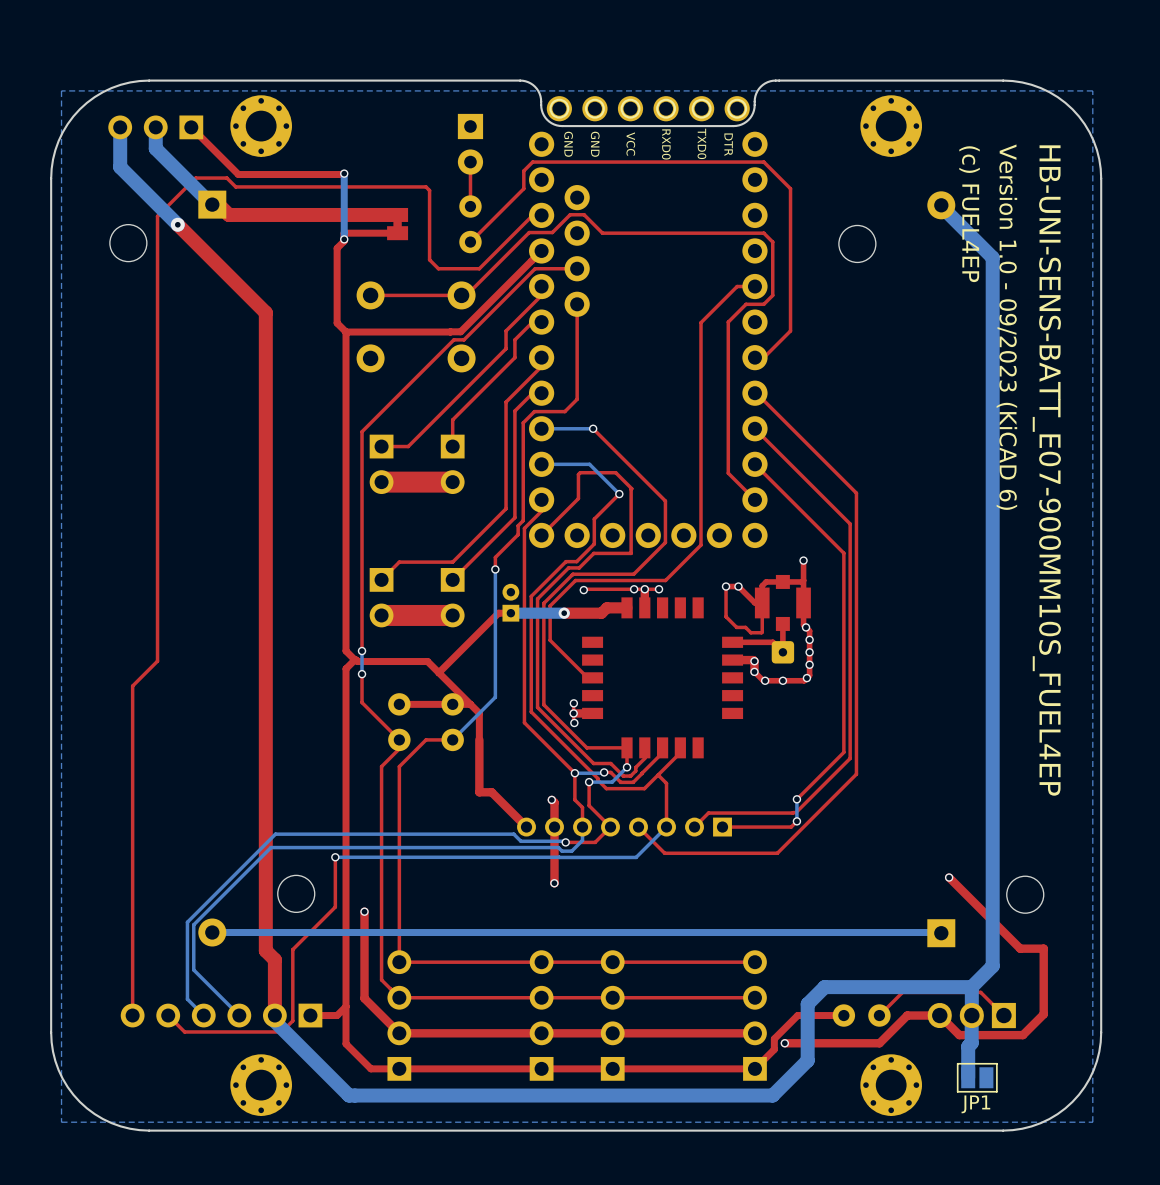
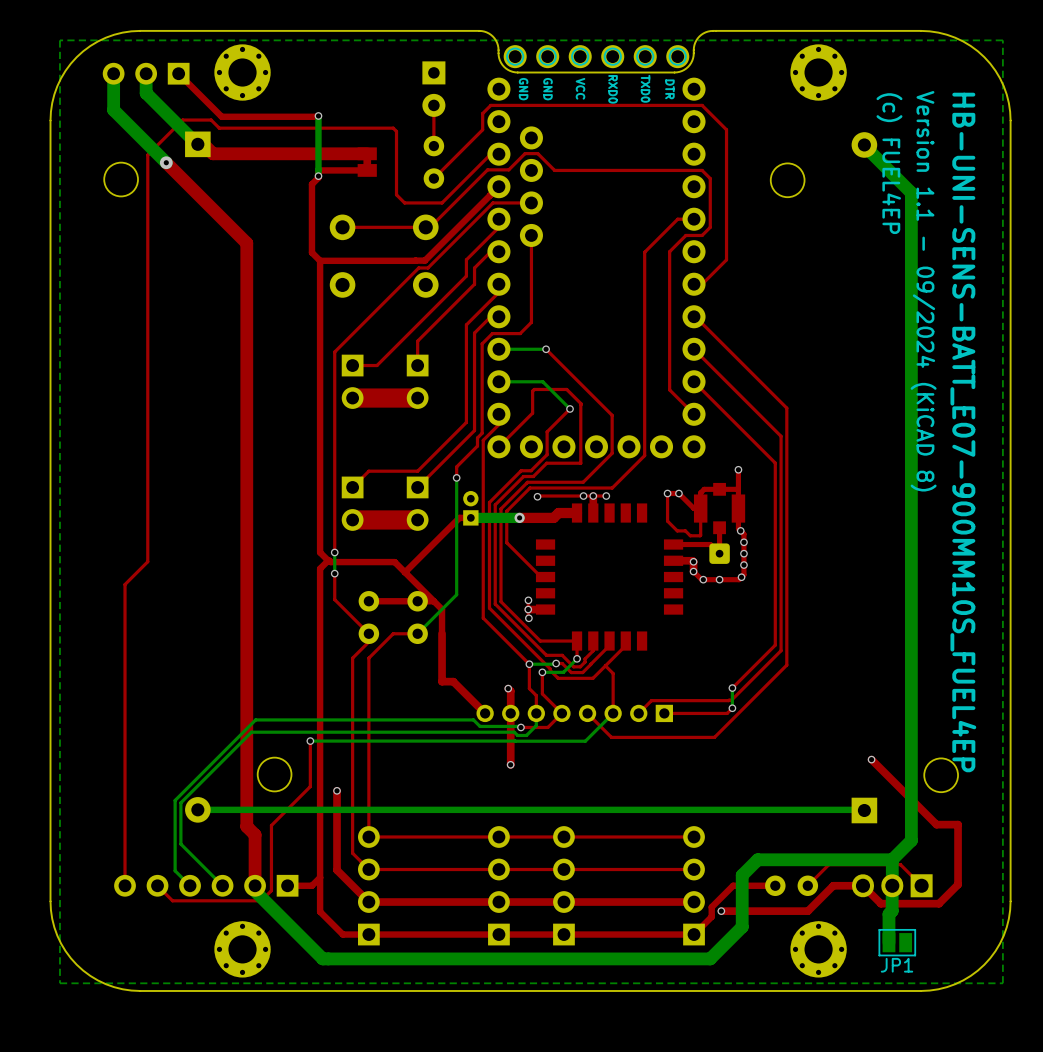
text: Version 1.0 - 09/2023 (KiCAD 6) (1006, 327) -> Version 1.1 - 09/2024 (KiCAD 8) (923, 291)

